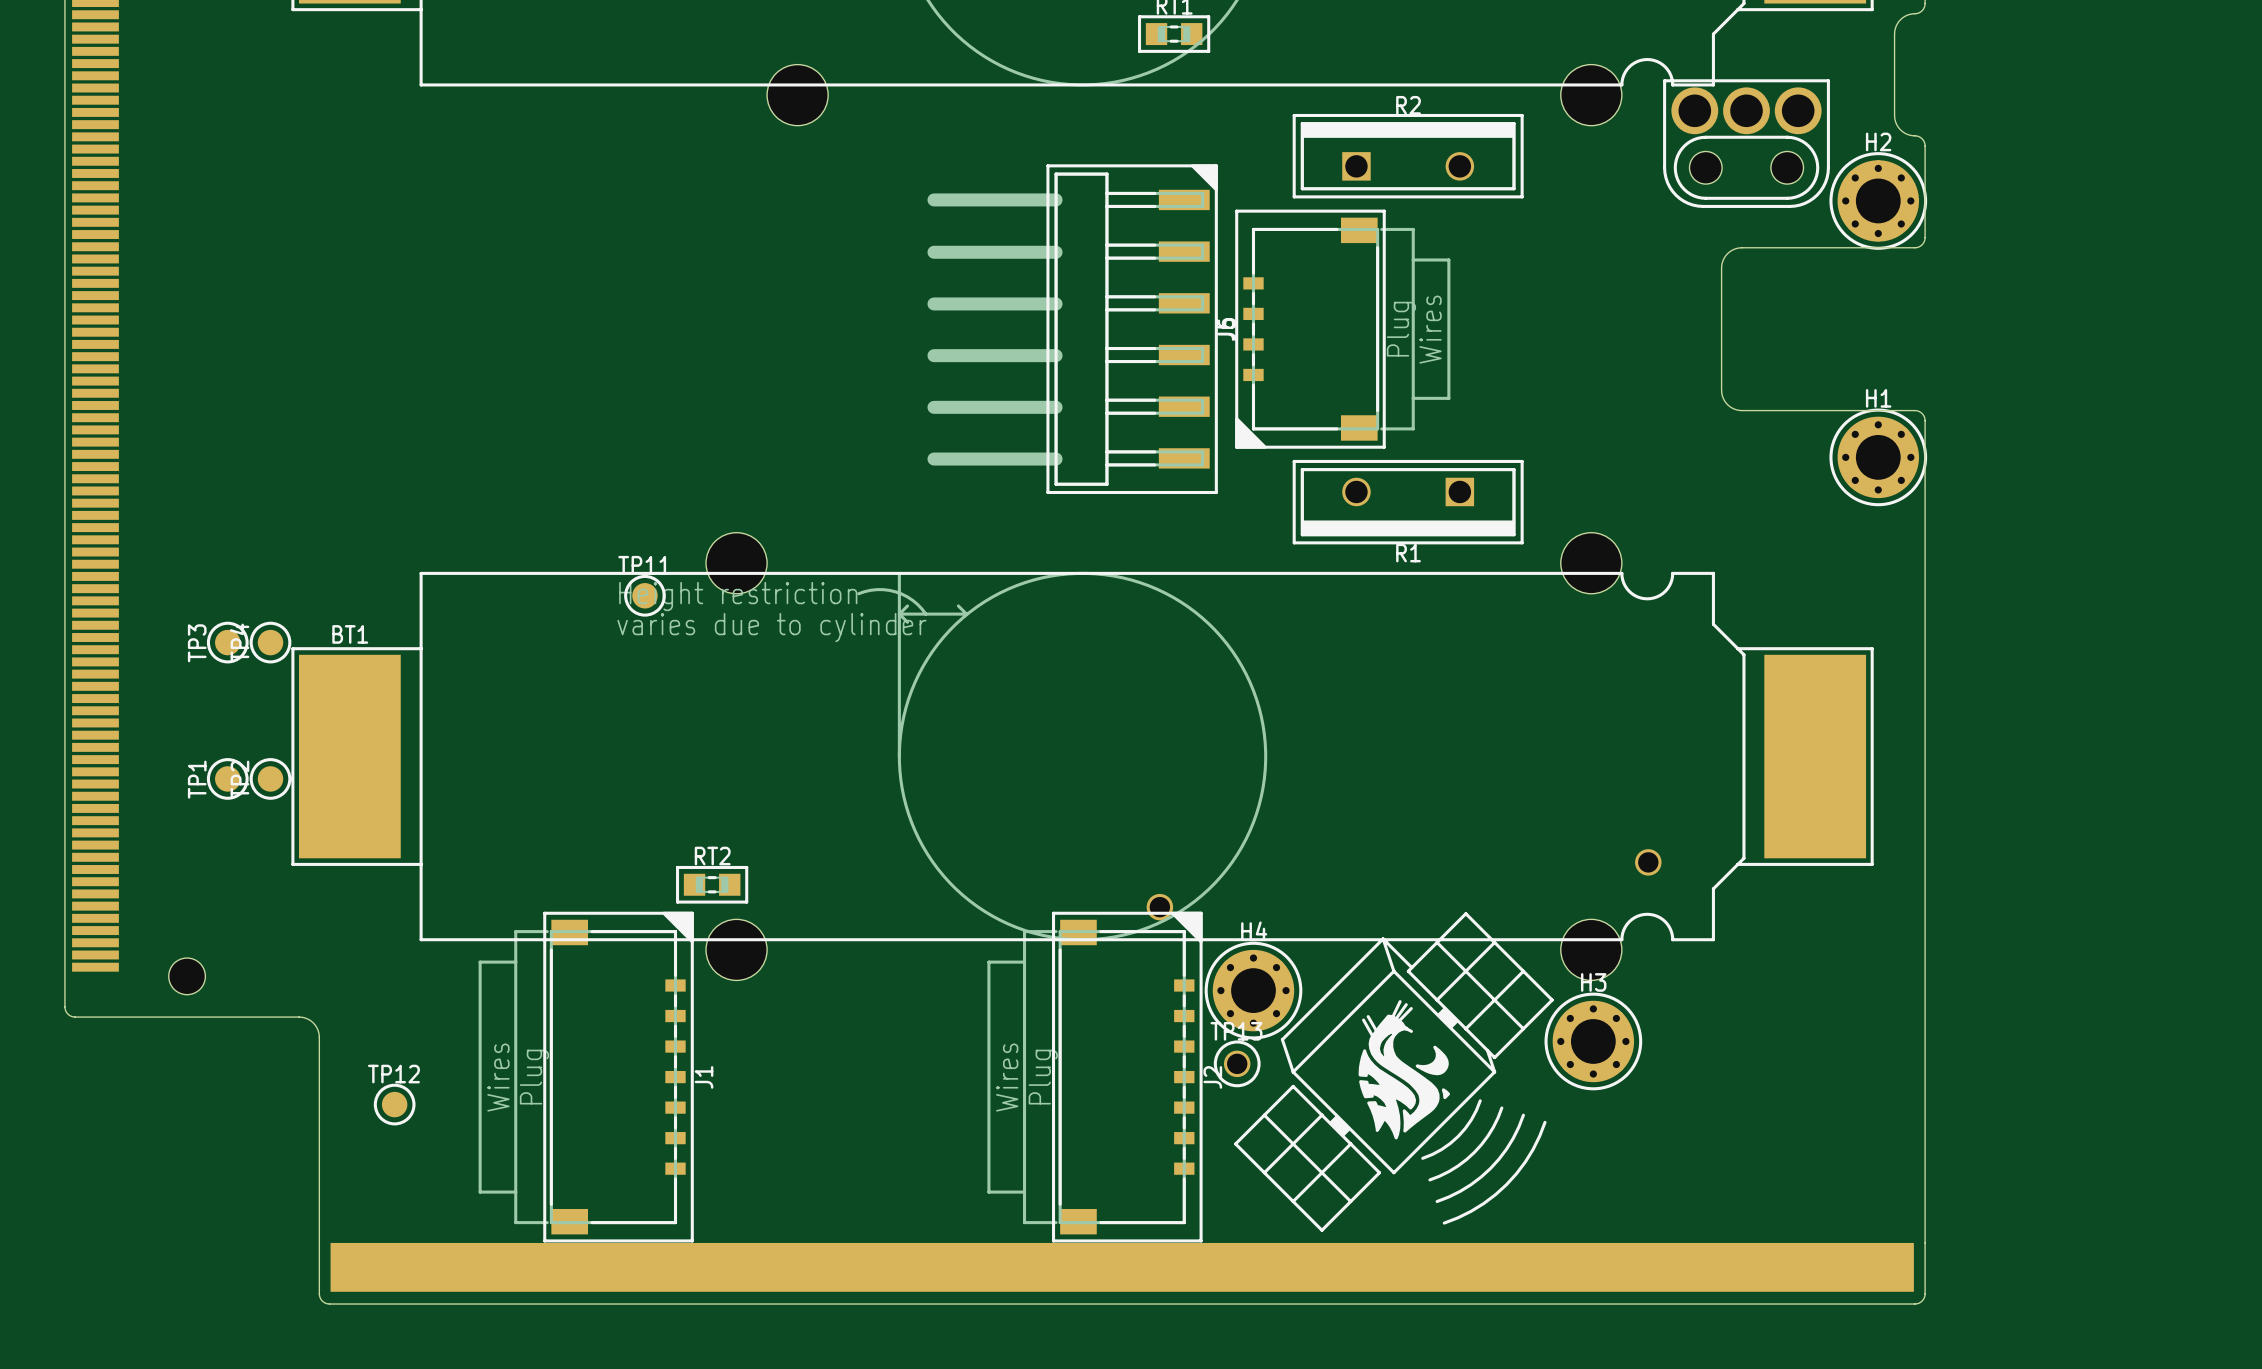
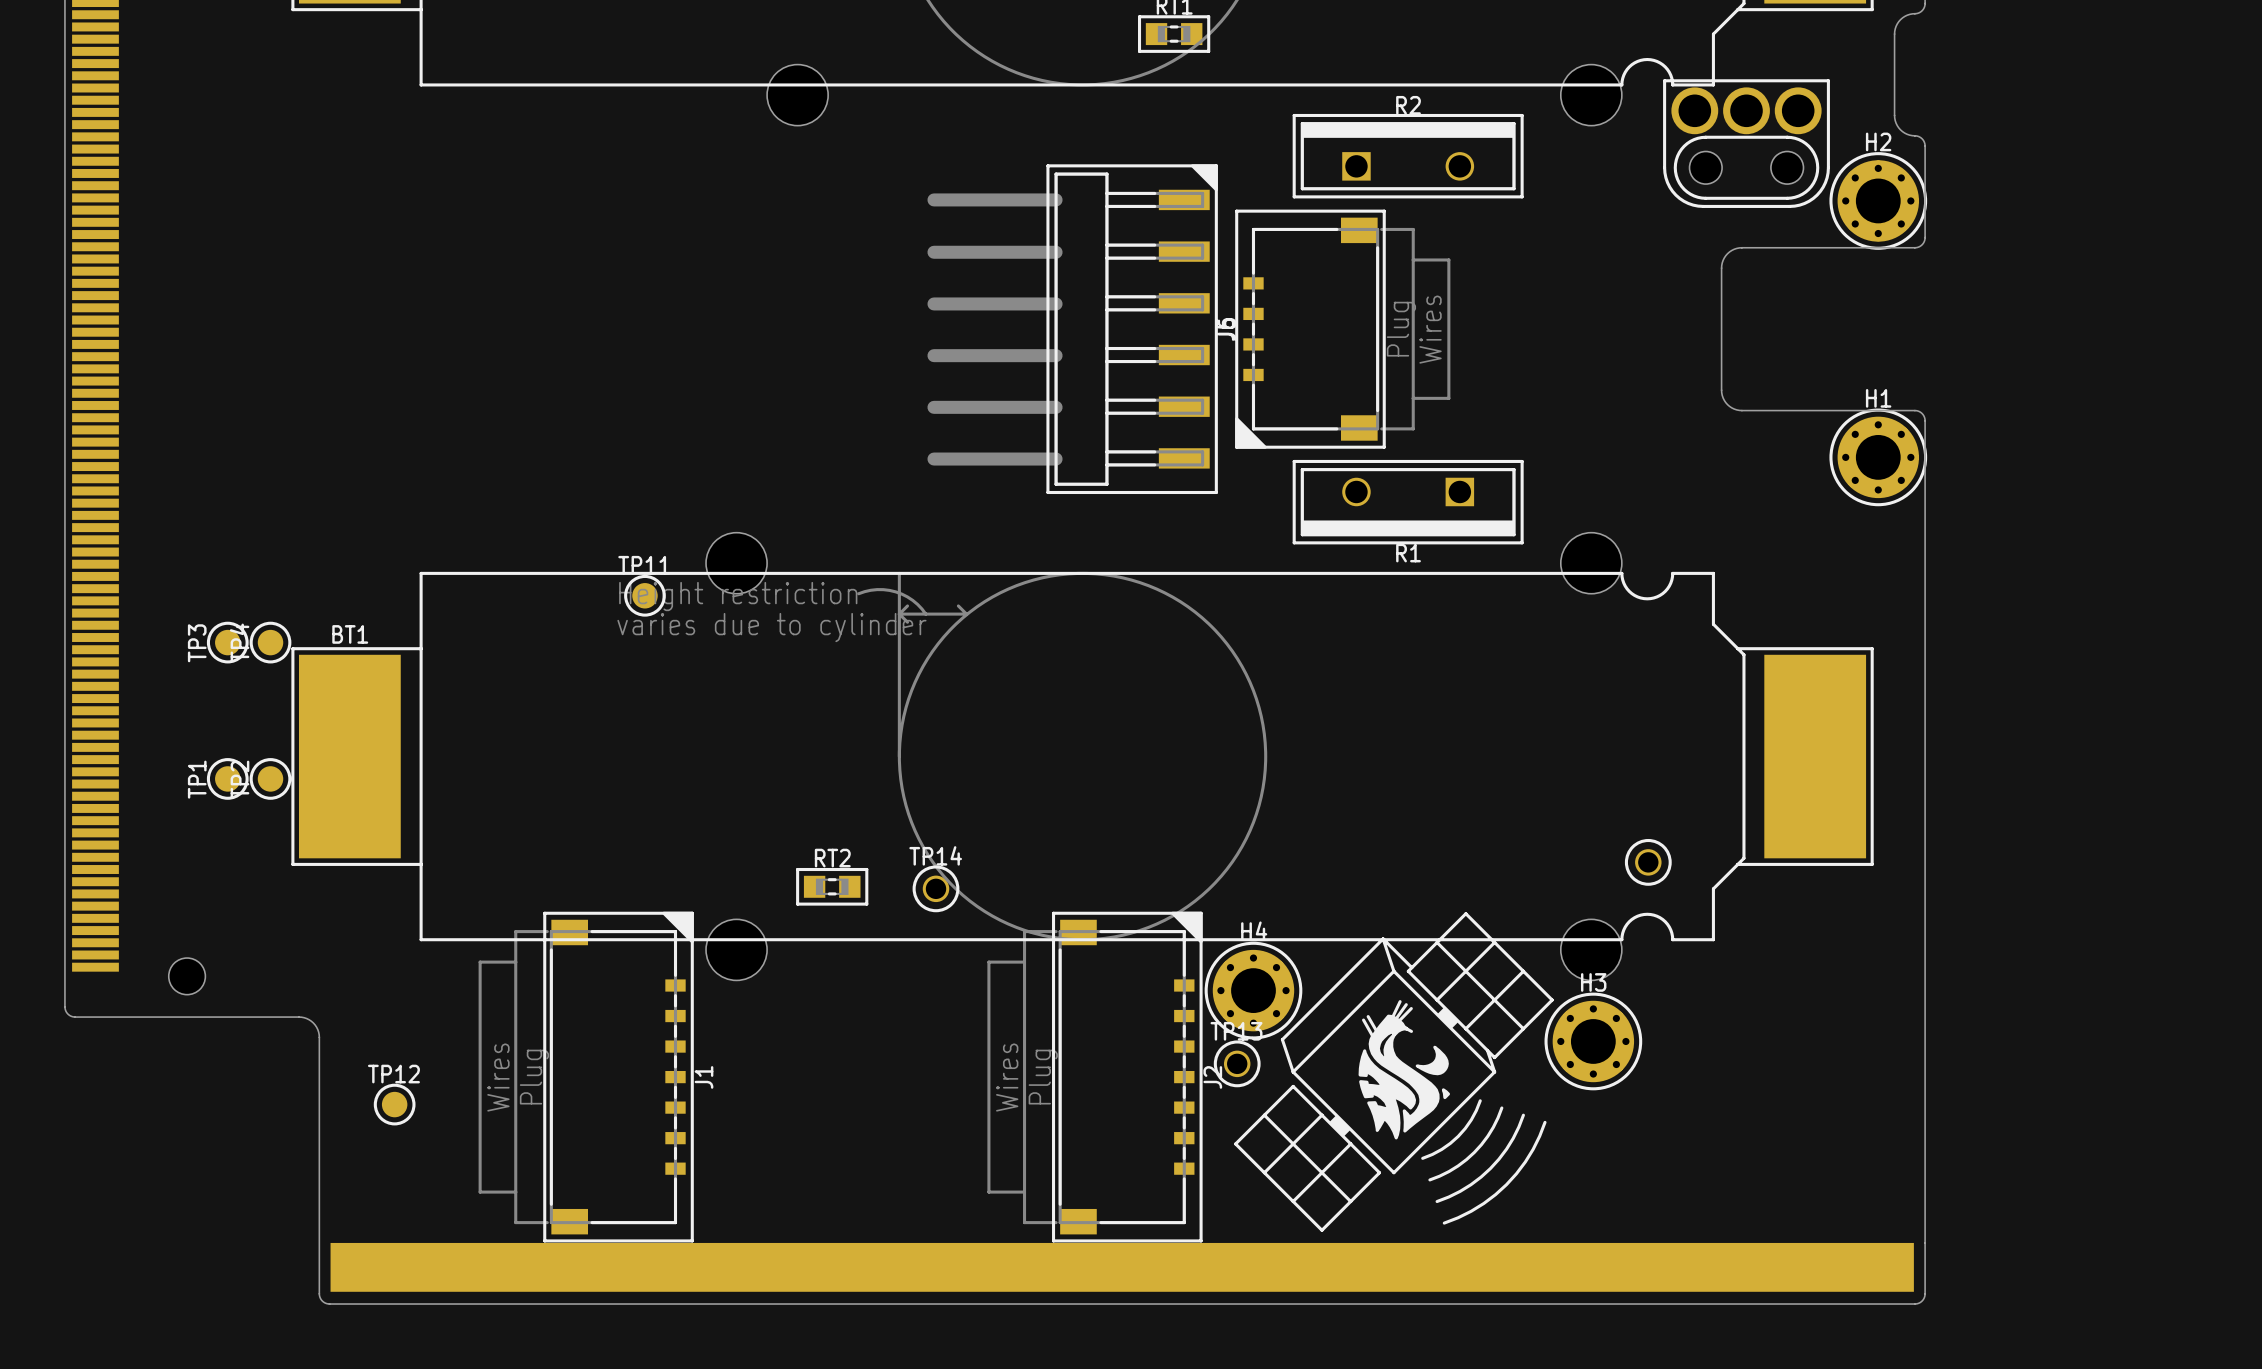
part footprint: [1635, 849, 1662, 876] -> [1624, 838, 1672, 886]
RT2 position: (712, 884) -> (832, 886)
TP14 side: bottom (1159, 907) -> top (936, 888)

